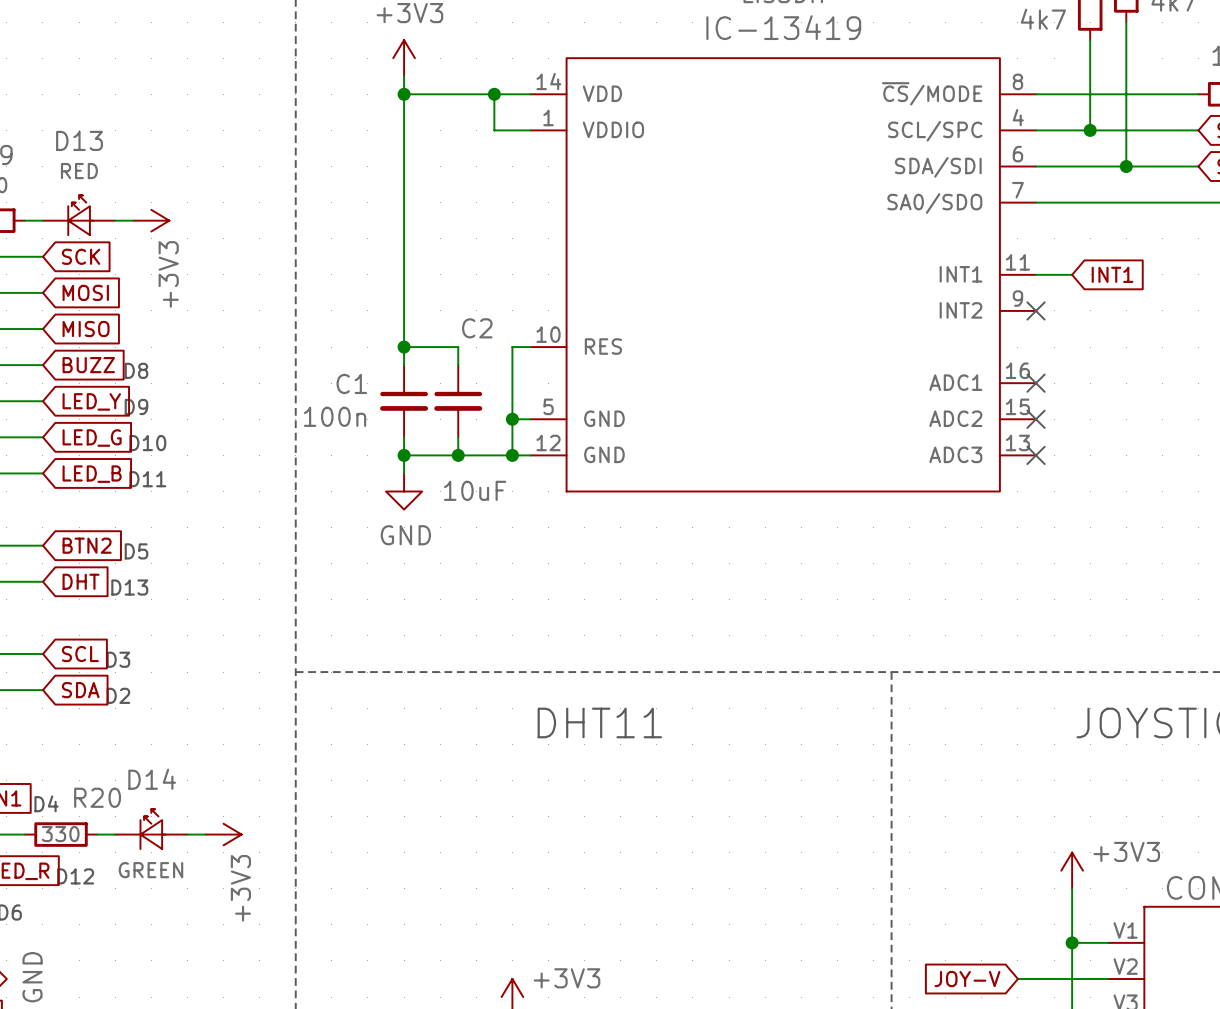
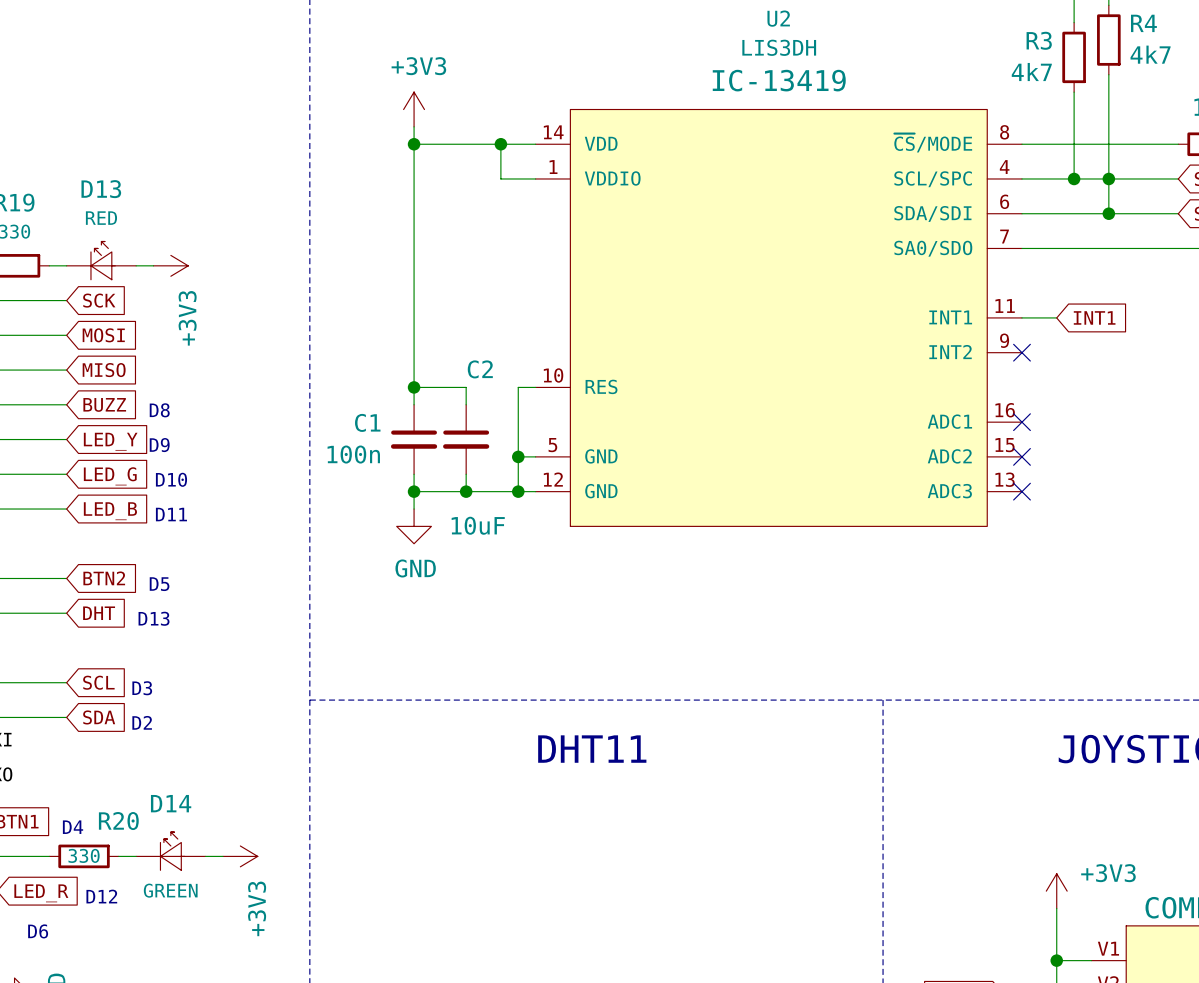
junction: none -> (1108, 178)

